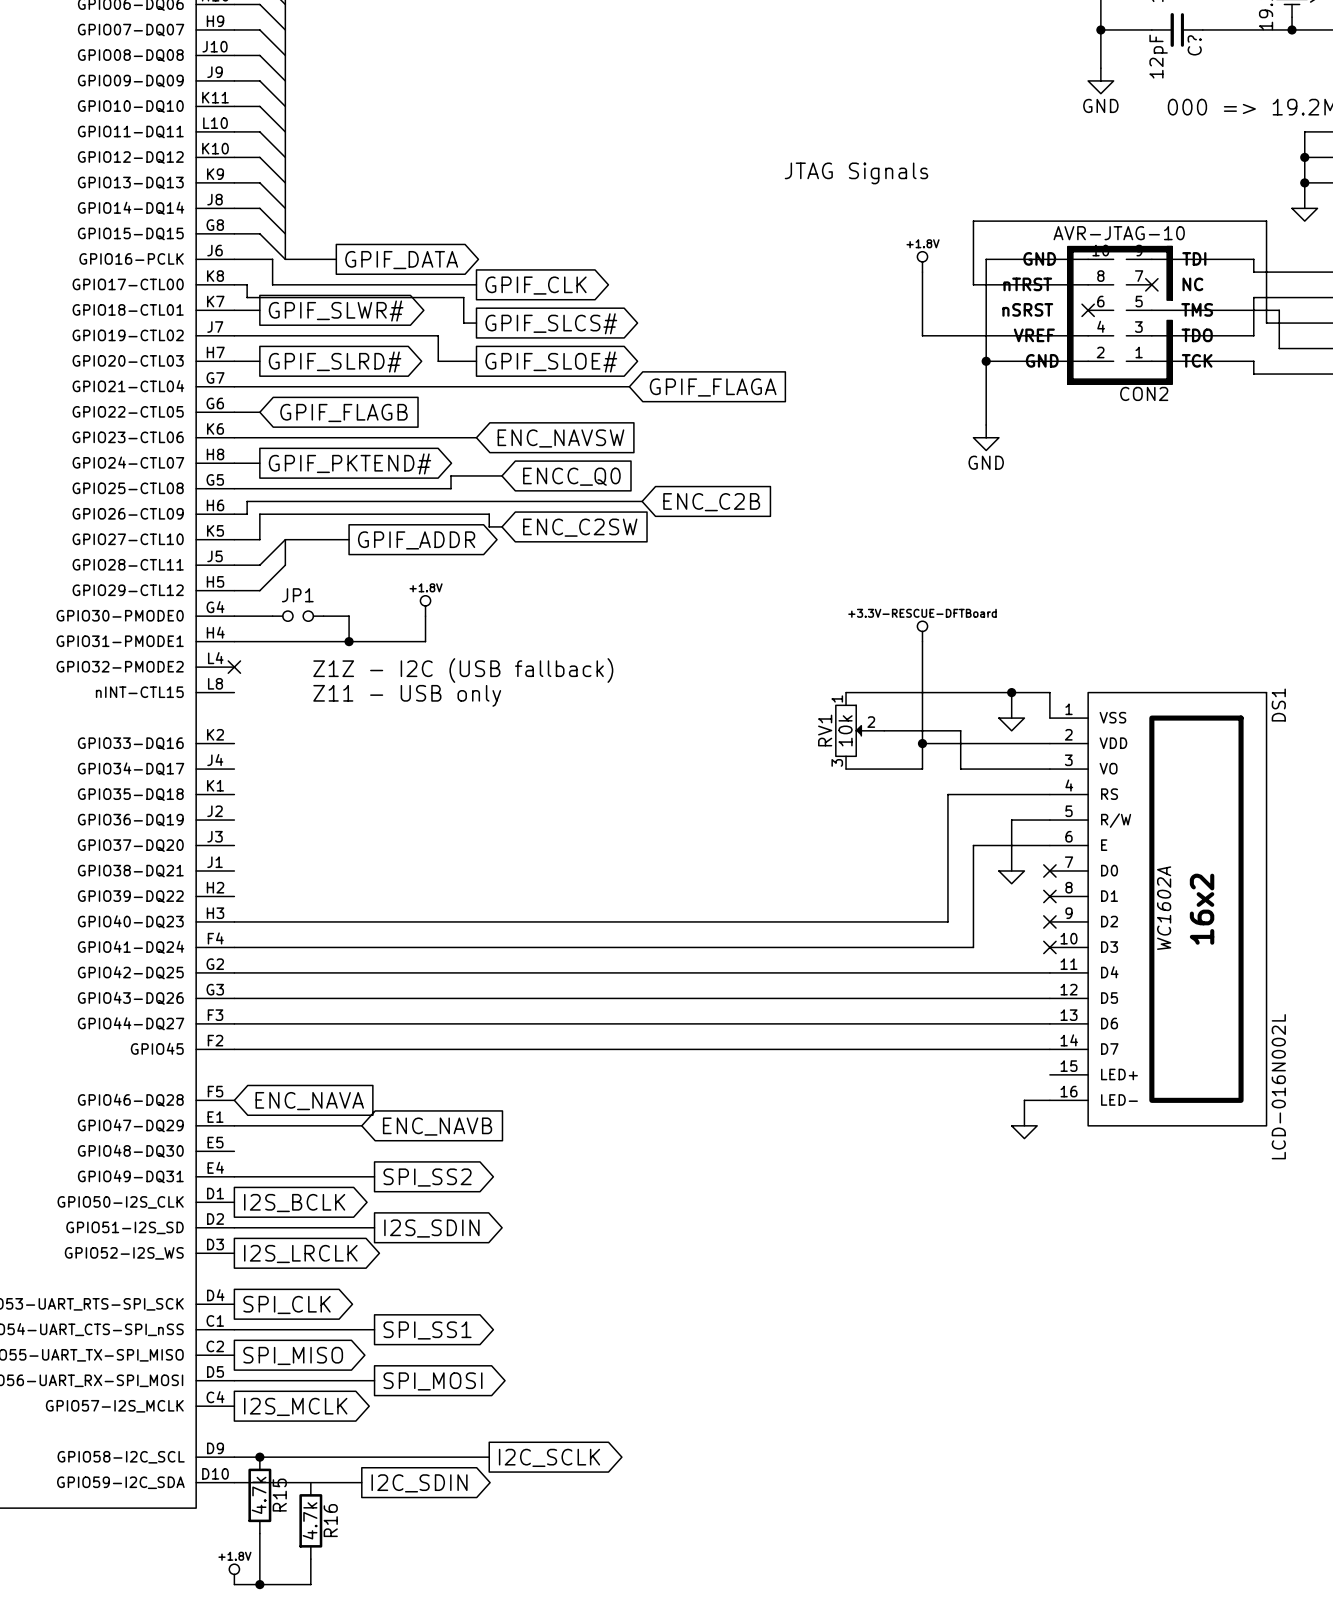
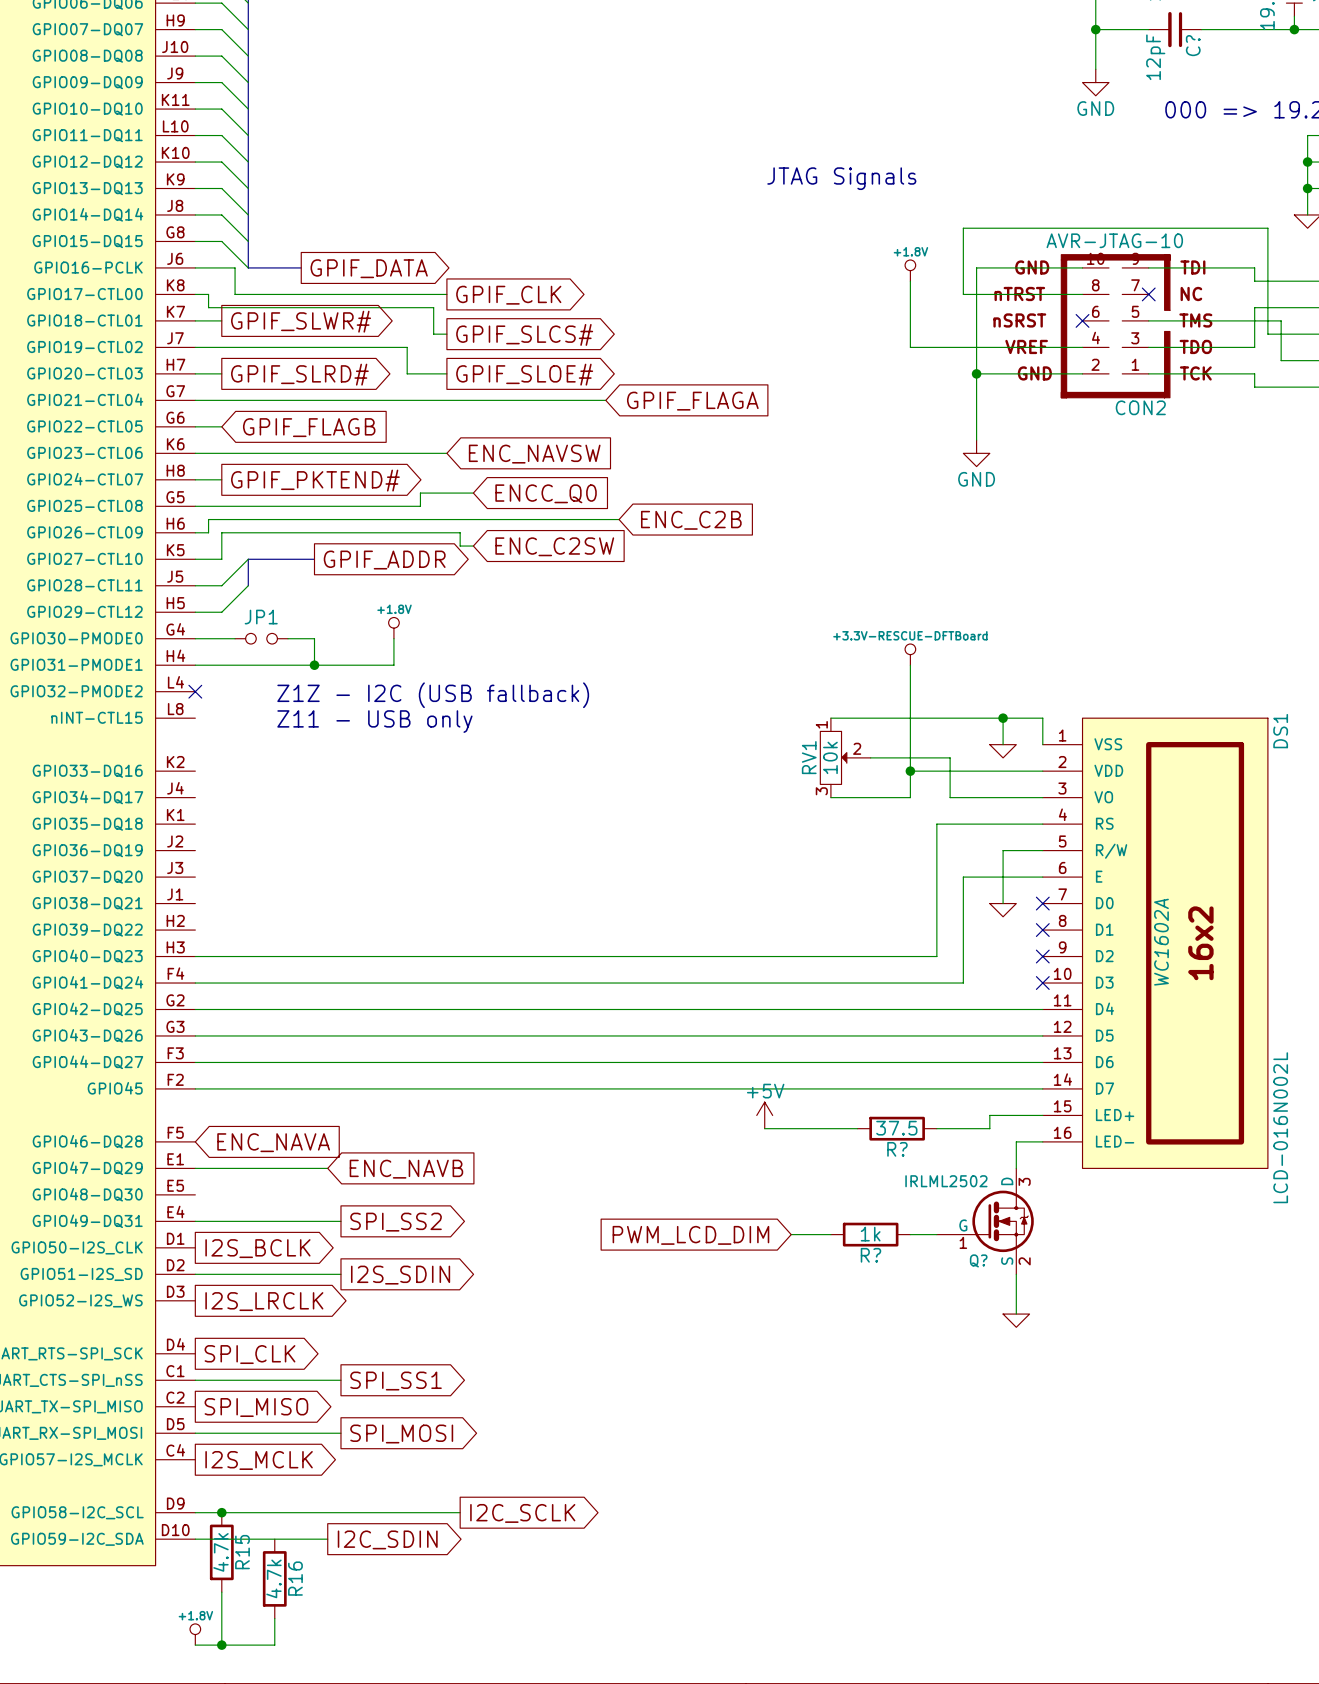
power symbol: none -> +5V (764, 1115)
wire: none -> (1042, 1115) (989, 1115) (989, 1128) (936, 1128)
wire: none -> (764, 1128) (857, 1128)
R?: none -> 37.5 (897, 1128)
power symbol position: (1024, 1132) -> (1016, 1320)
Q?: none -> IRLML2502 (985, 1221)
wire: none -> (791, 1234) (830, 1234)
R?: none -> 1k (870, 1234)
wire: none -> (910, 1234) (936, 1234)
global label: none -> PWM_LCD_DIM (690, 1235)
wire: none -> (1016, 1274) (1016, 1314)

